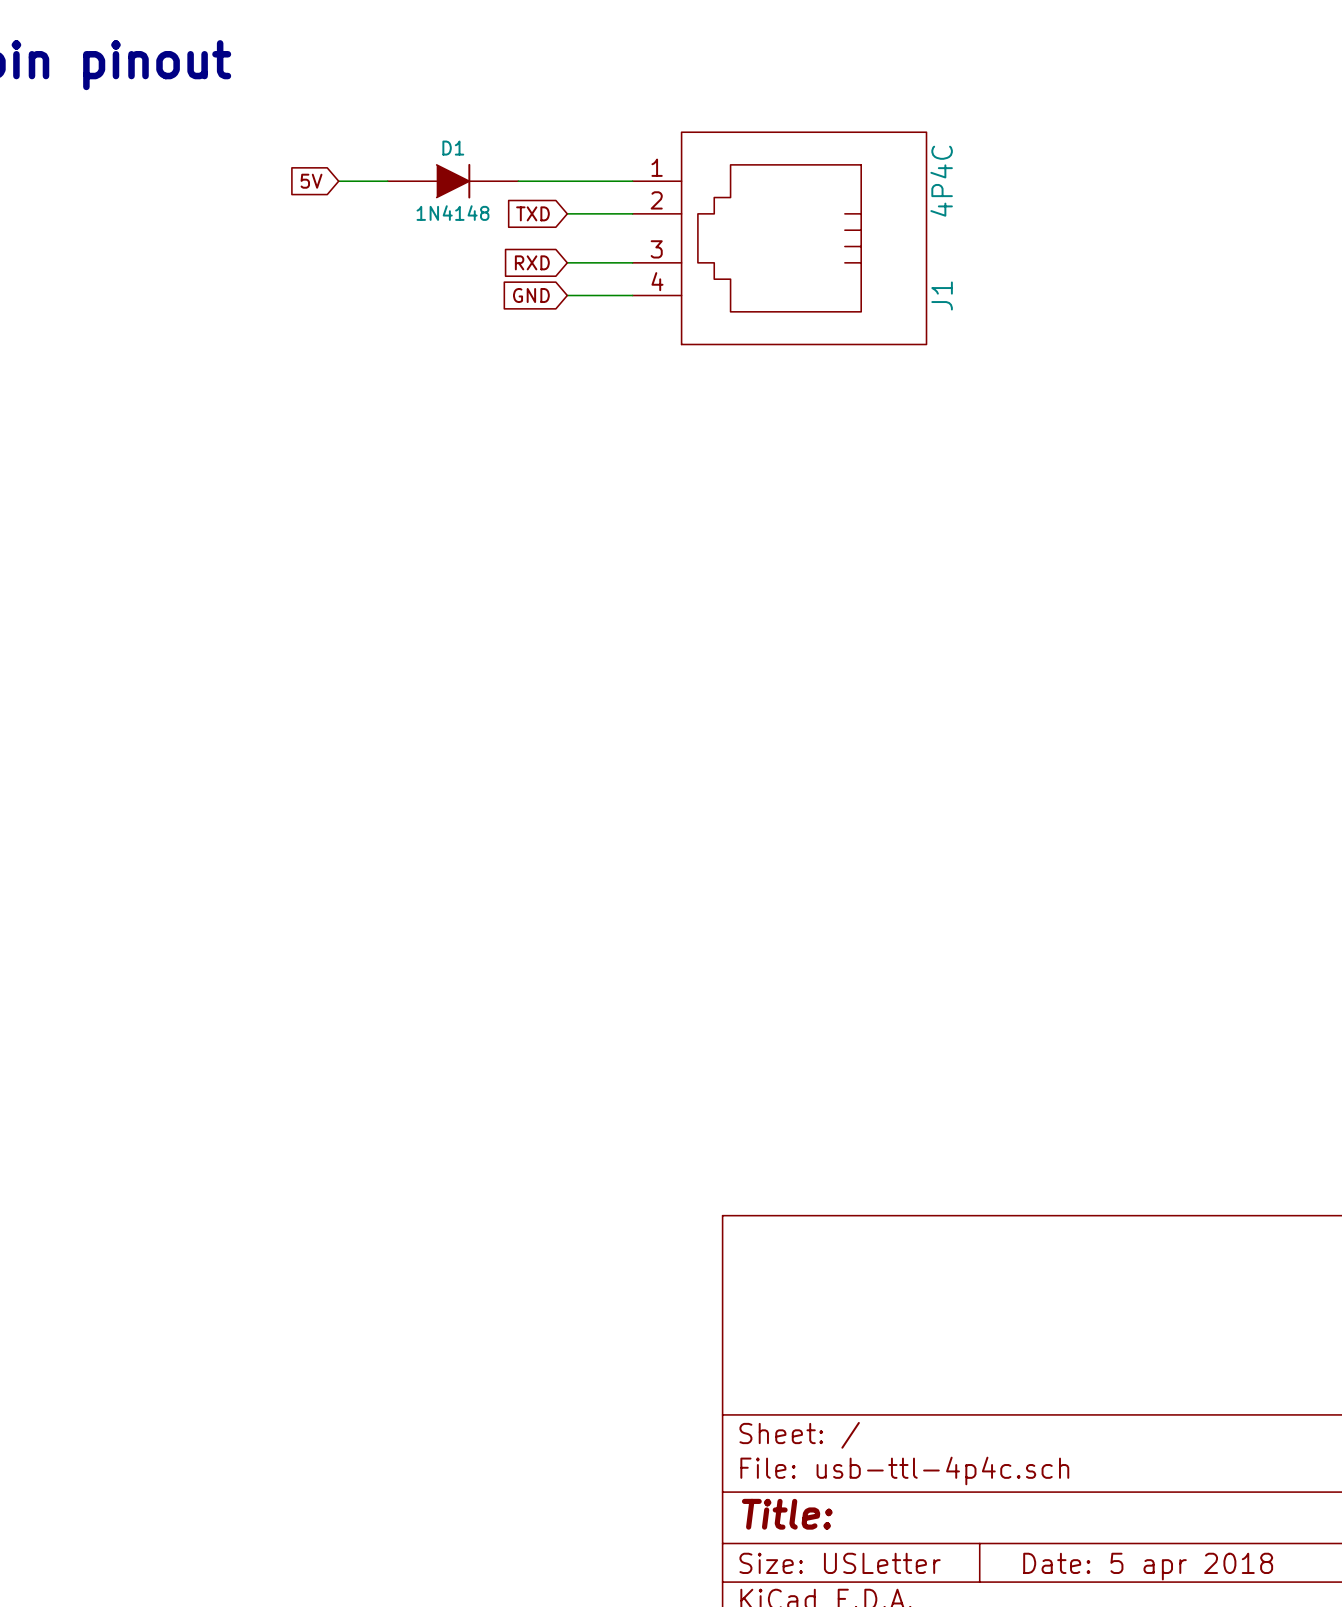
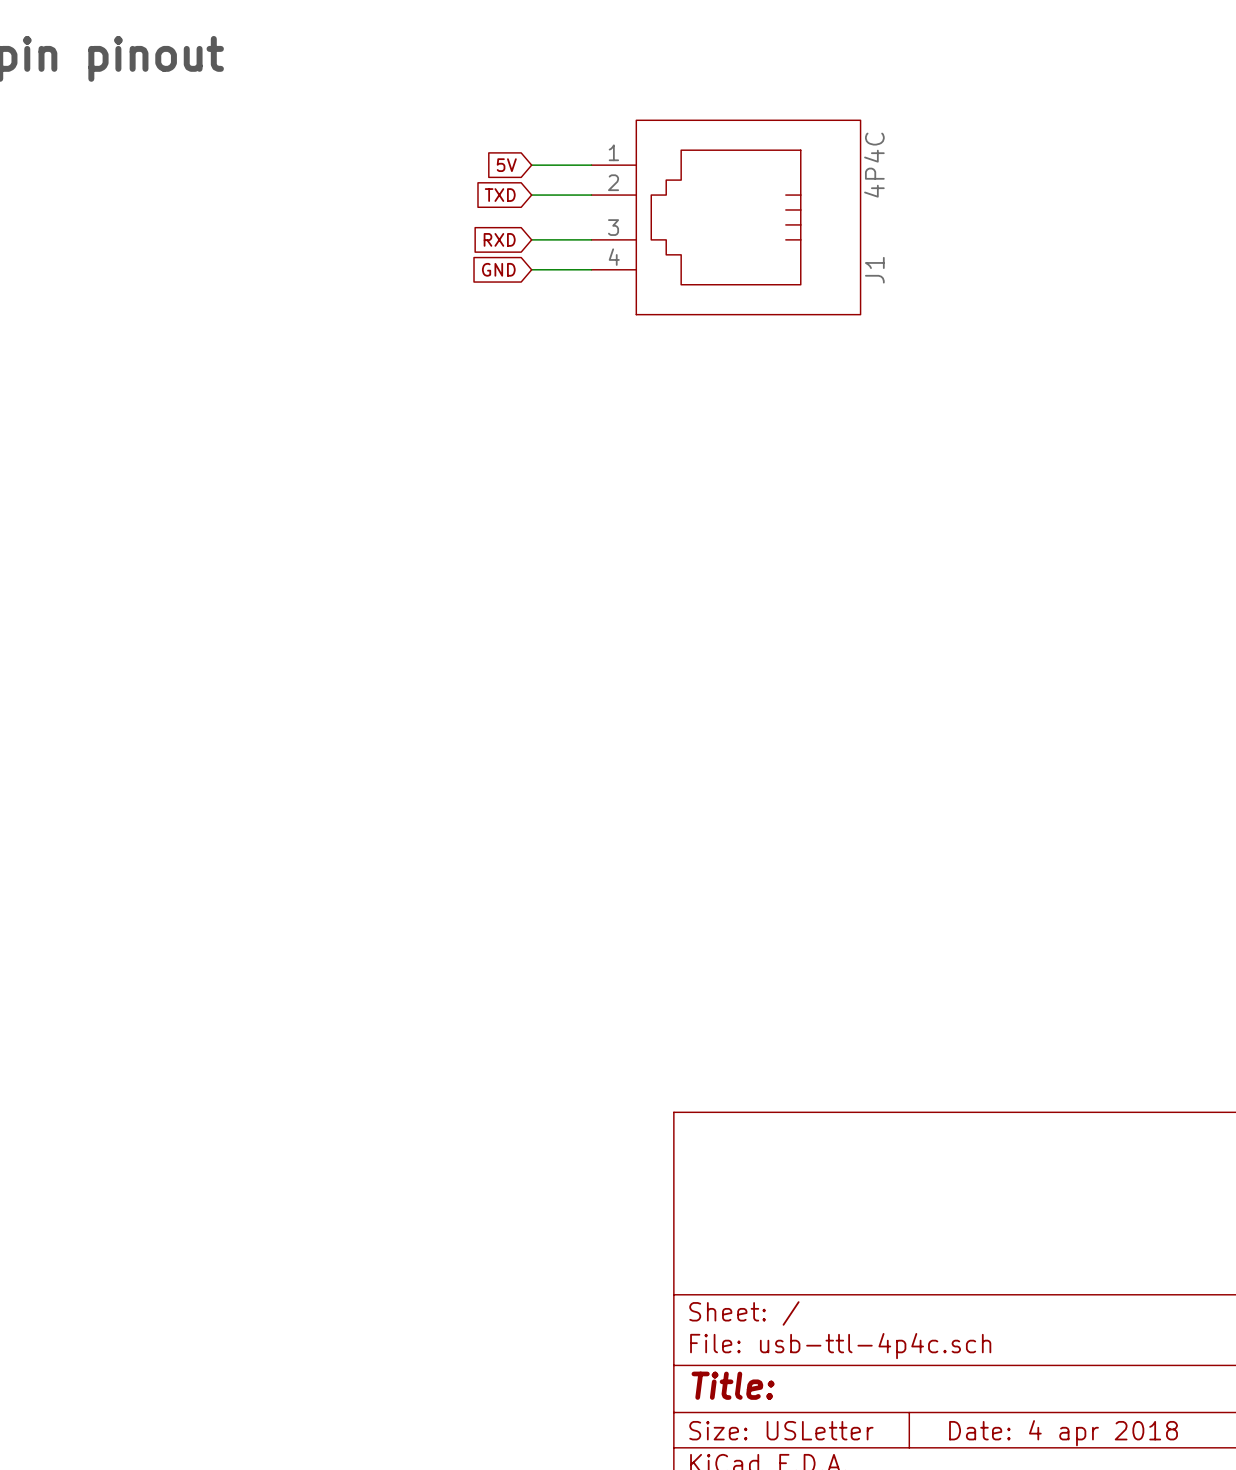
global label position: 5V (311, 181) -> 5V (506, 165)
wire: (338, 181) (387, 181) -> none
D1: 1N4148 (452, 181) -> none
wire: (518, 181) (567, 181) -> none
title block: Date: 5 apr 2018 (1148, 1566) -> Date: 4 apr 2018 (1063, 1433)

